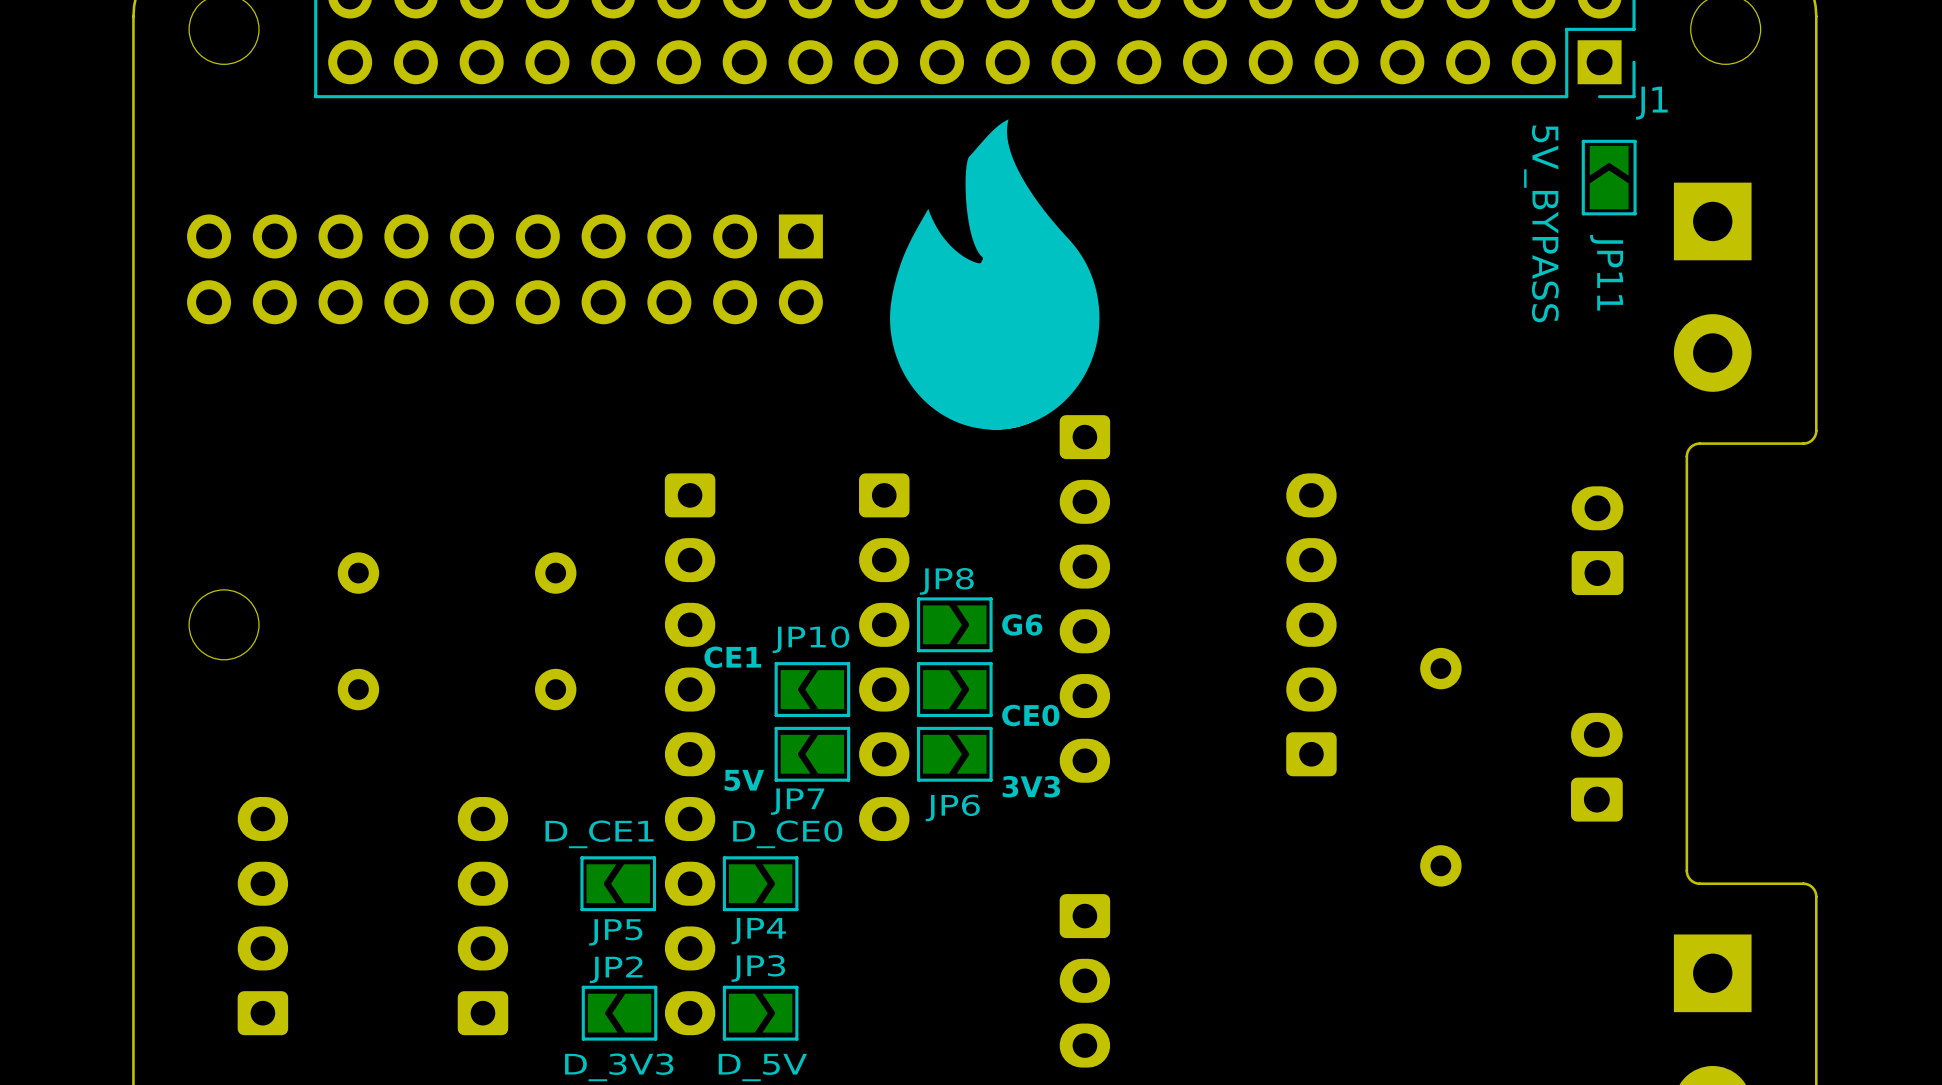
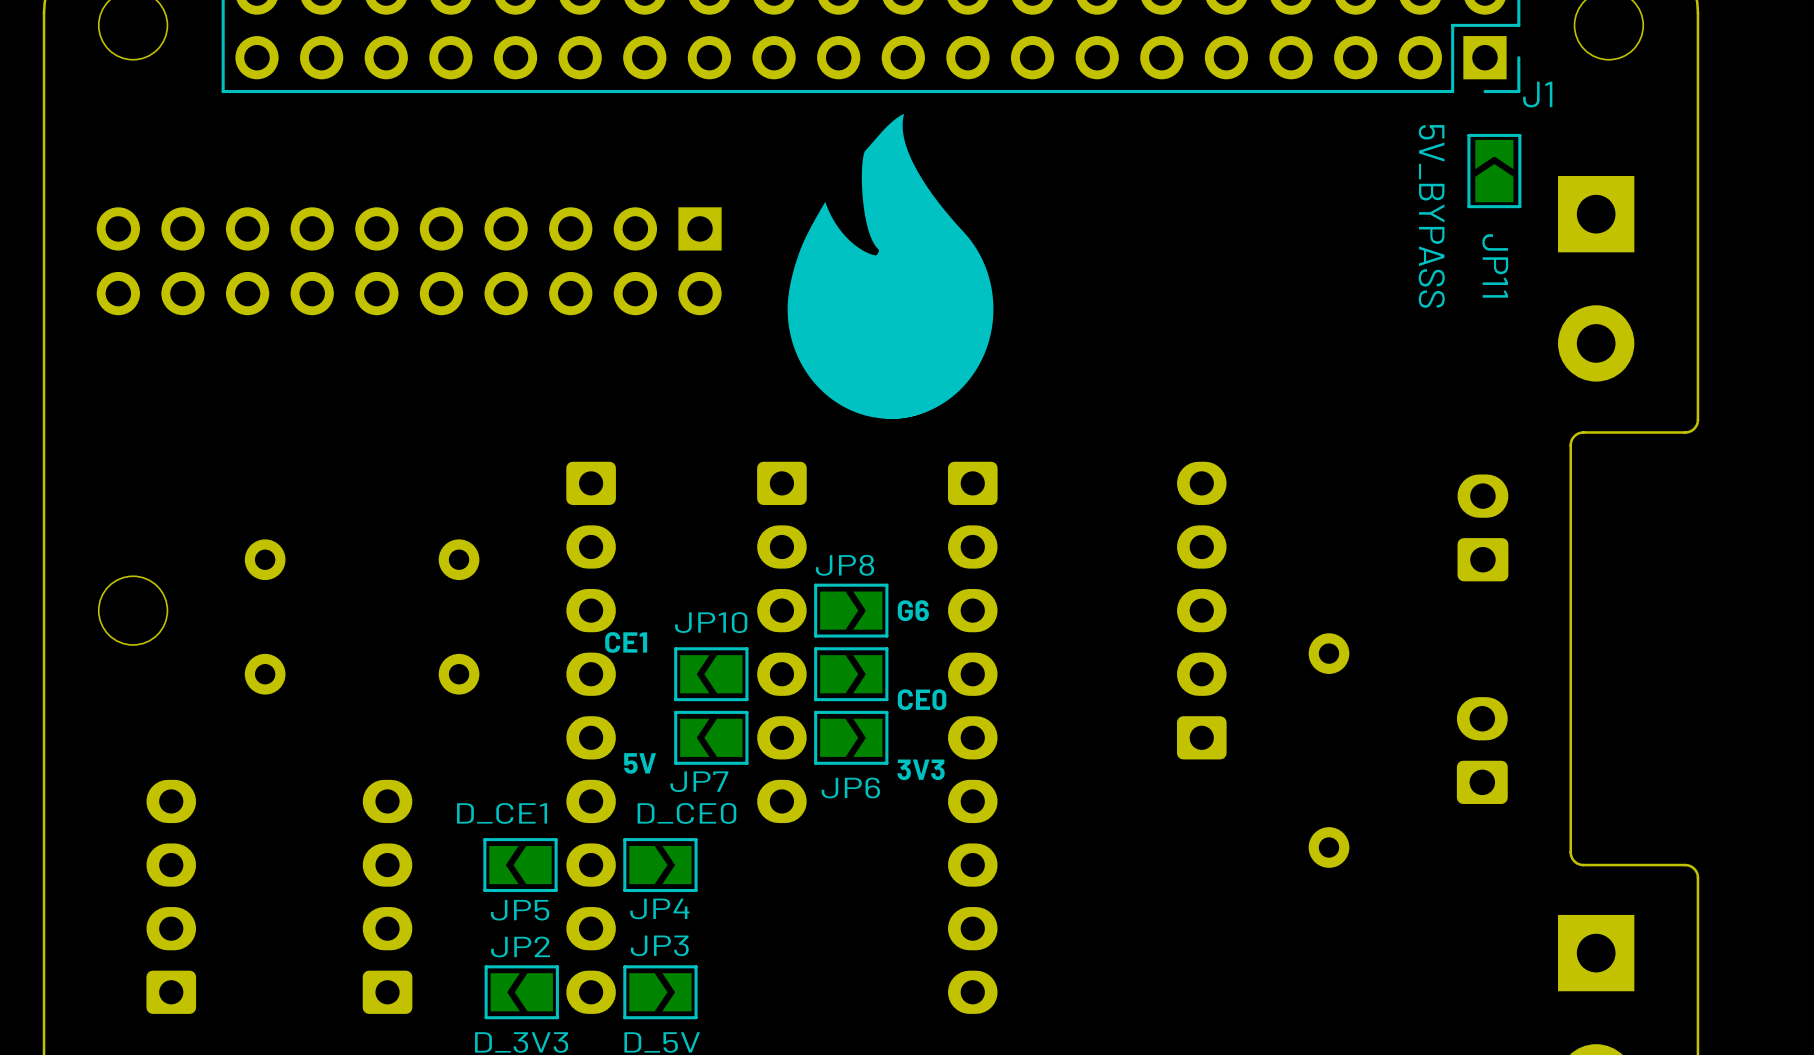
part: (1084, 598) -> none
part: none -> (972, 737)
part: (1084, 980) -> none

